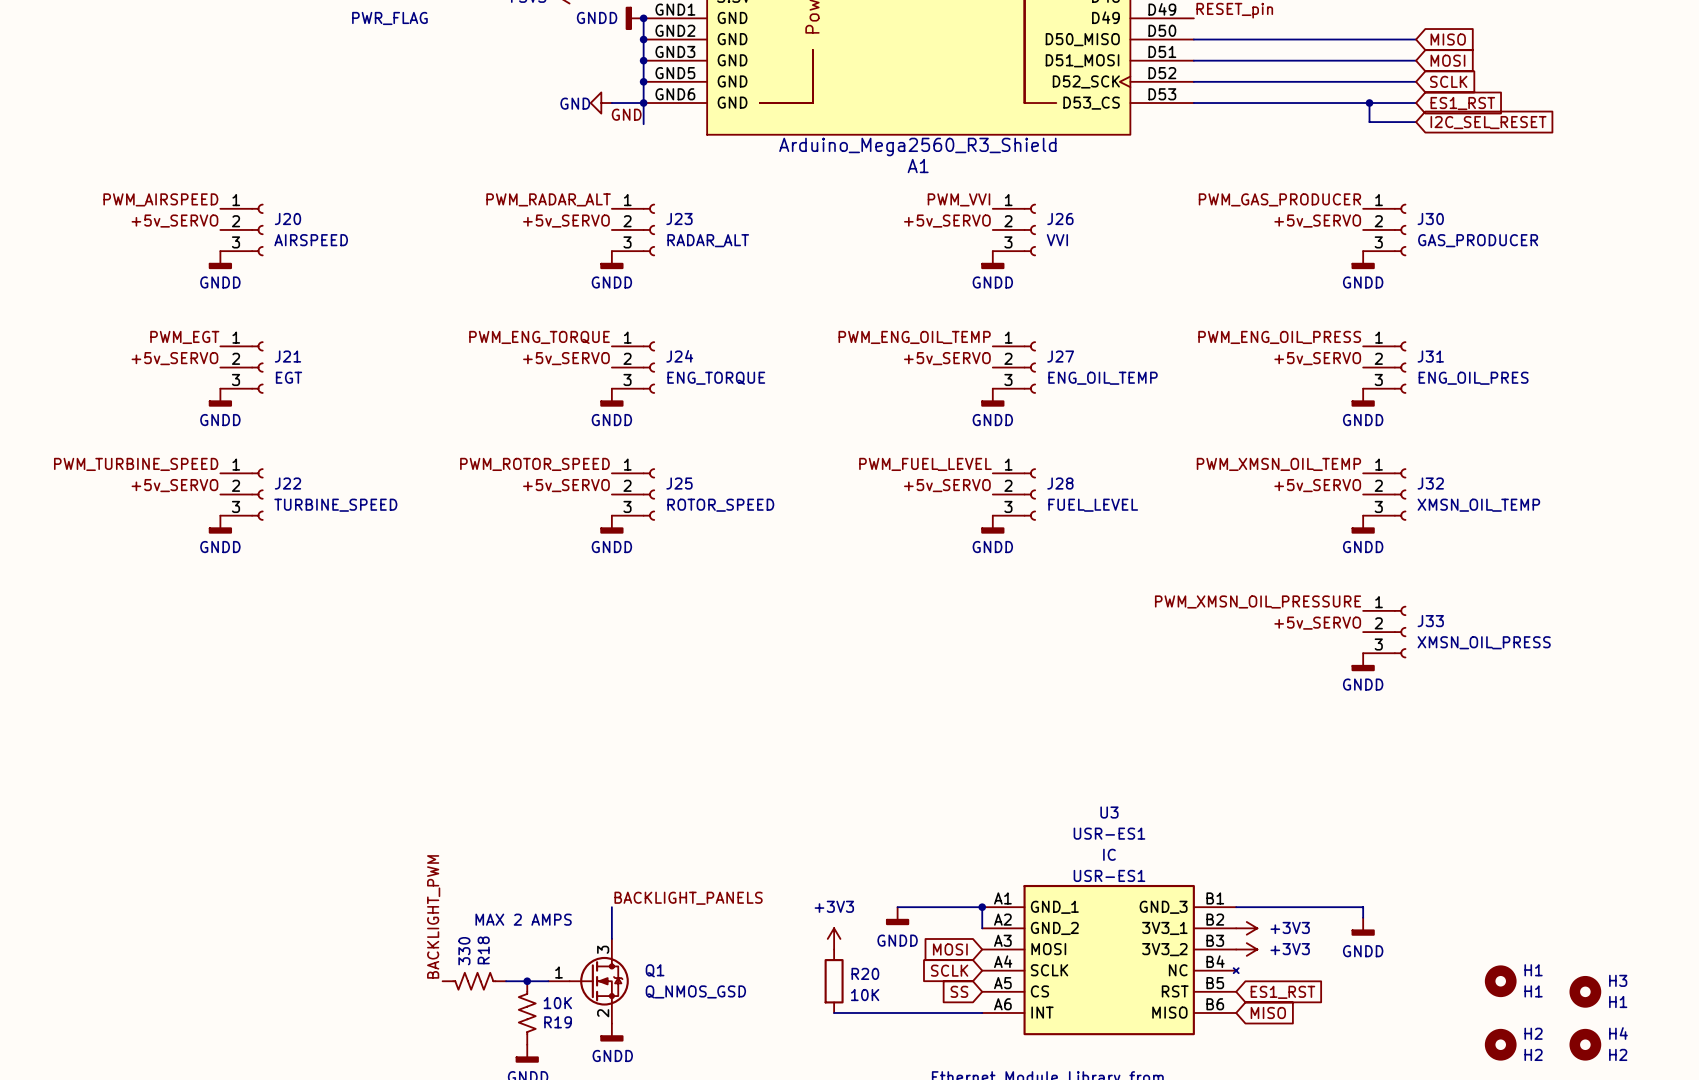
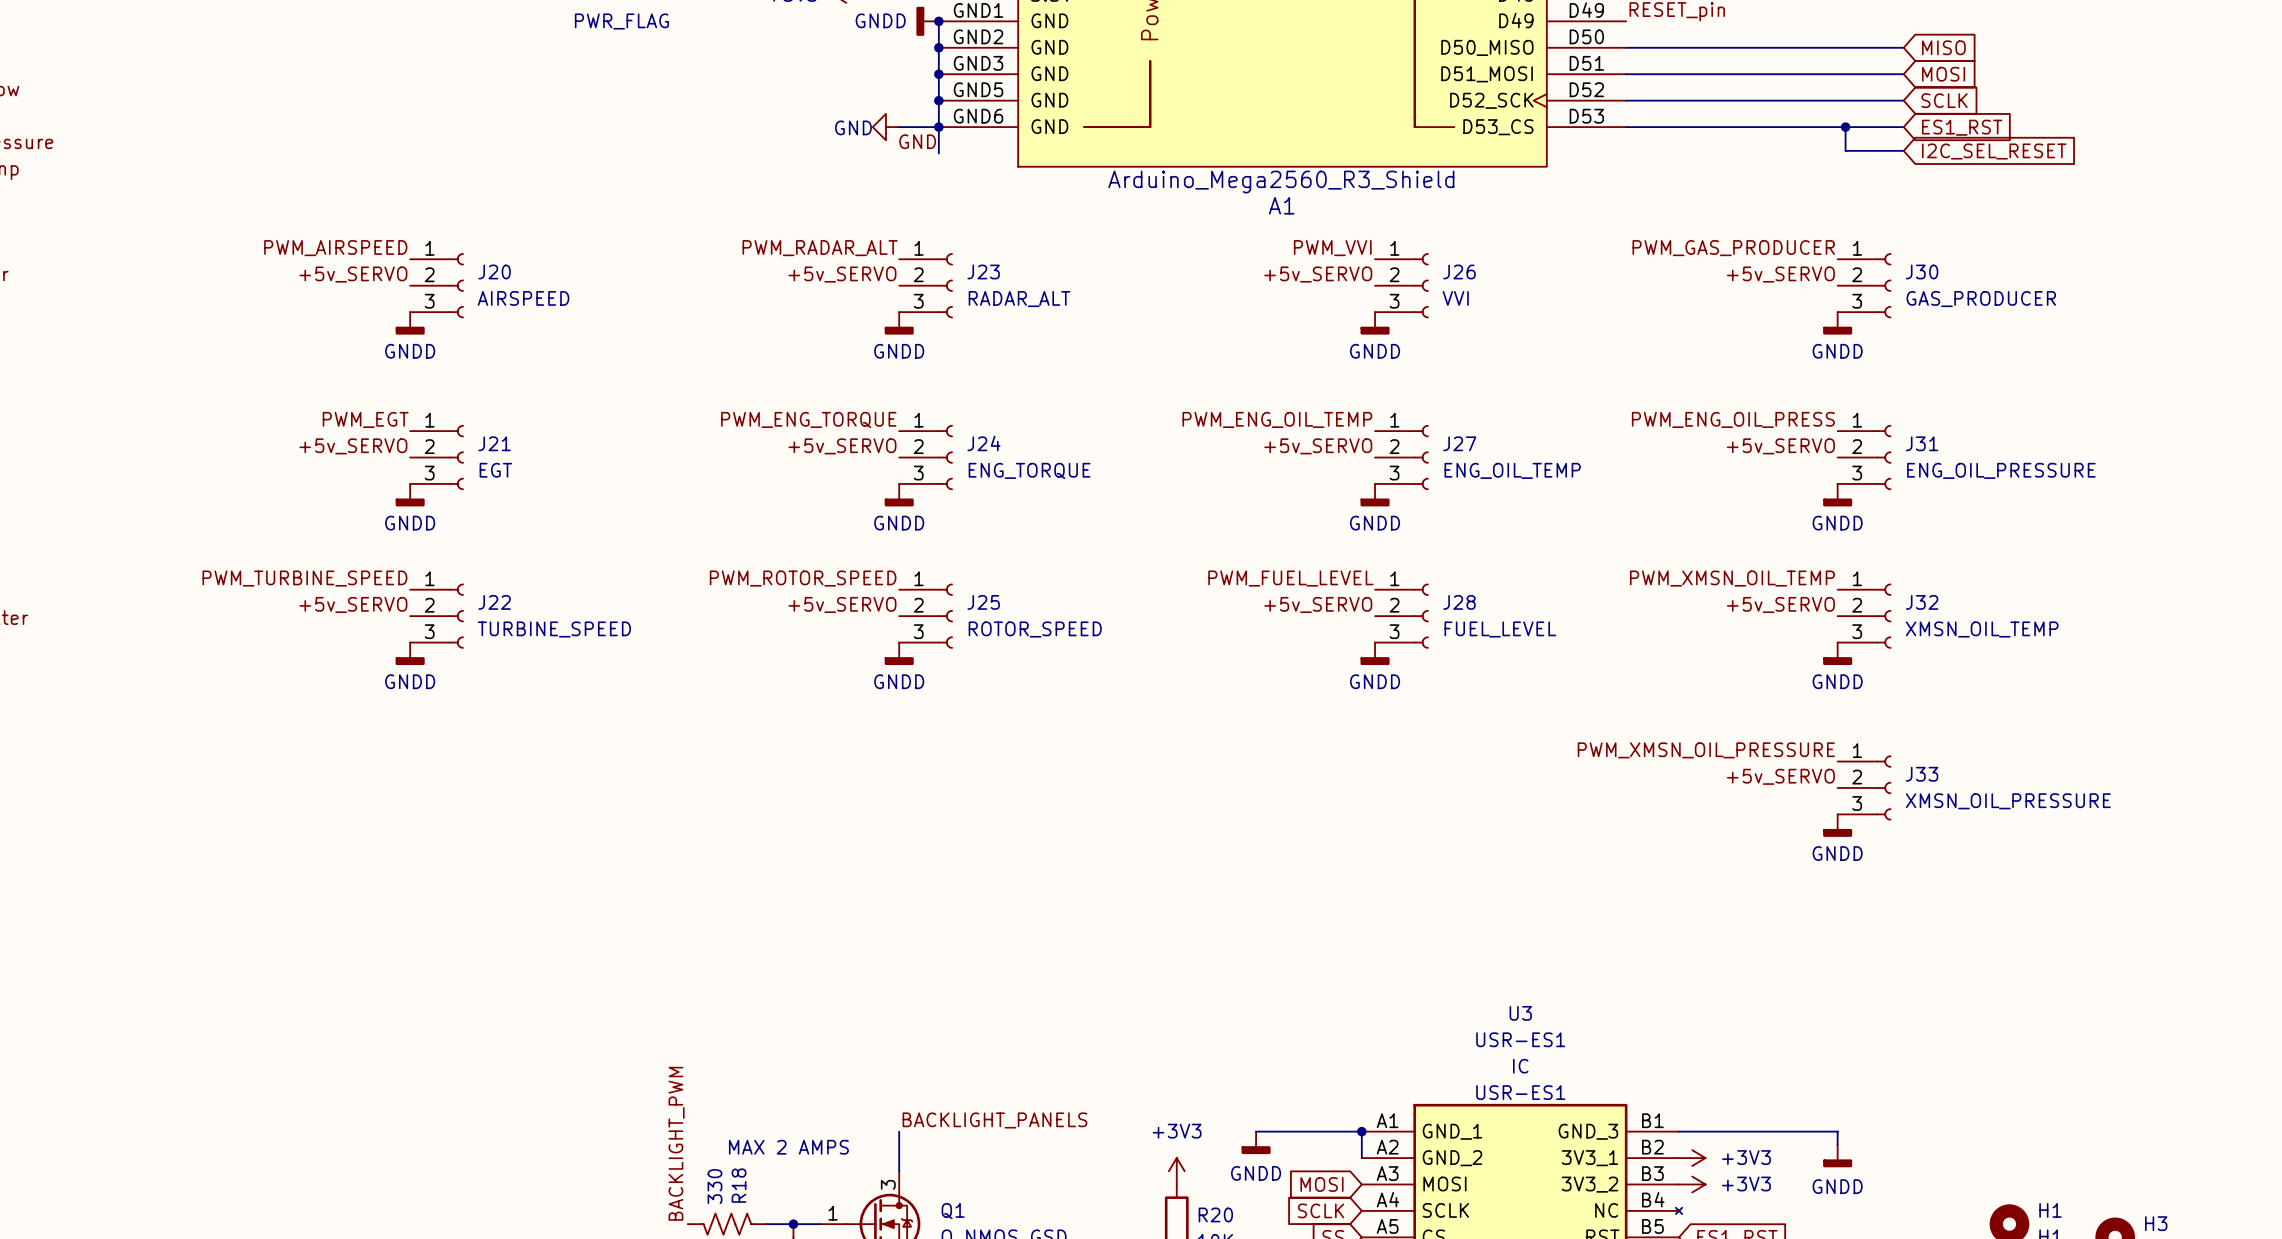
J31 value: ENG_OIL_PRES (1473, 378) -> ENG_OIL_PRESSURE (2001, 470)
J33 value: XMSN_OIL_PRESS (1484, 642) -> XMSN_OIL_PRESSURE (2008, 801)

